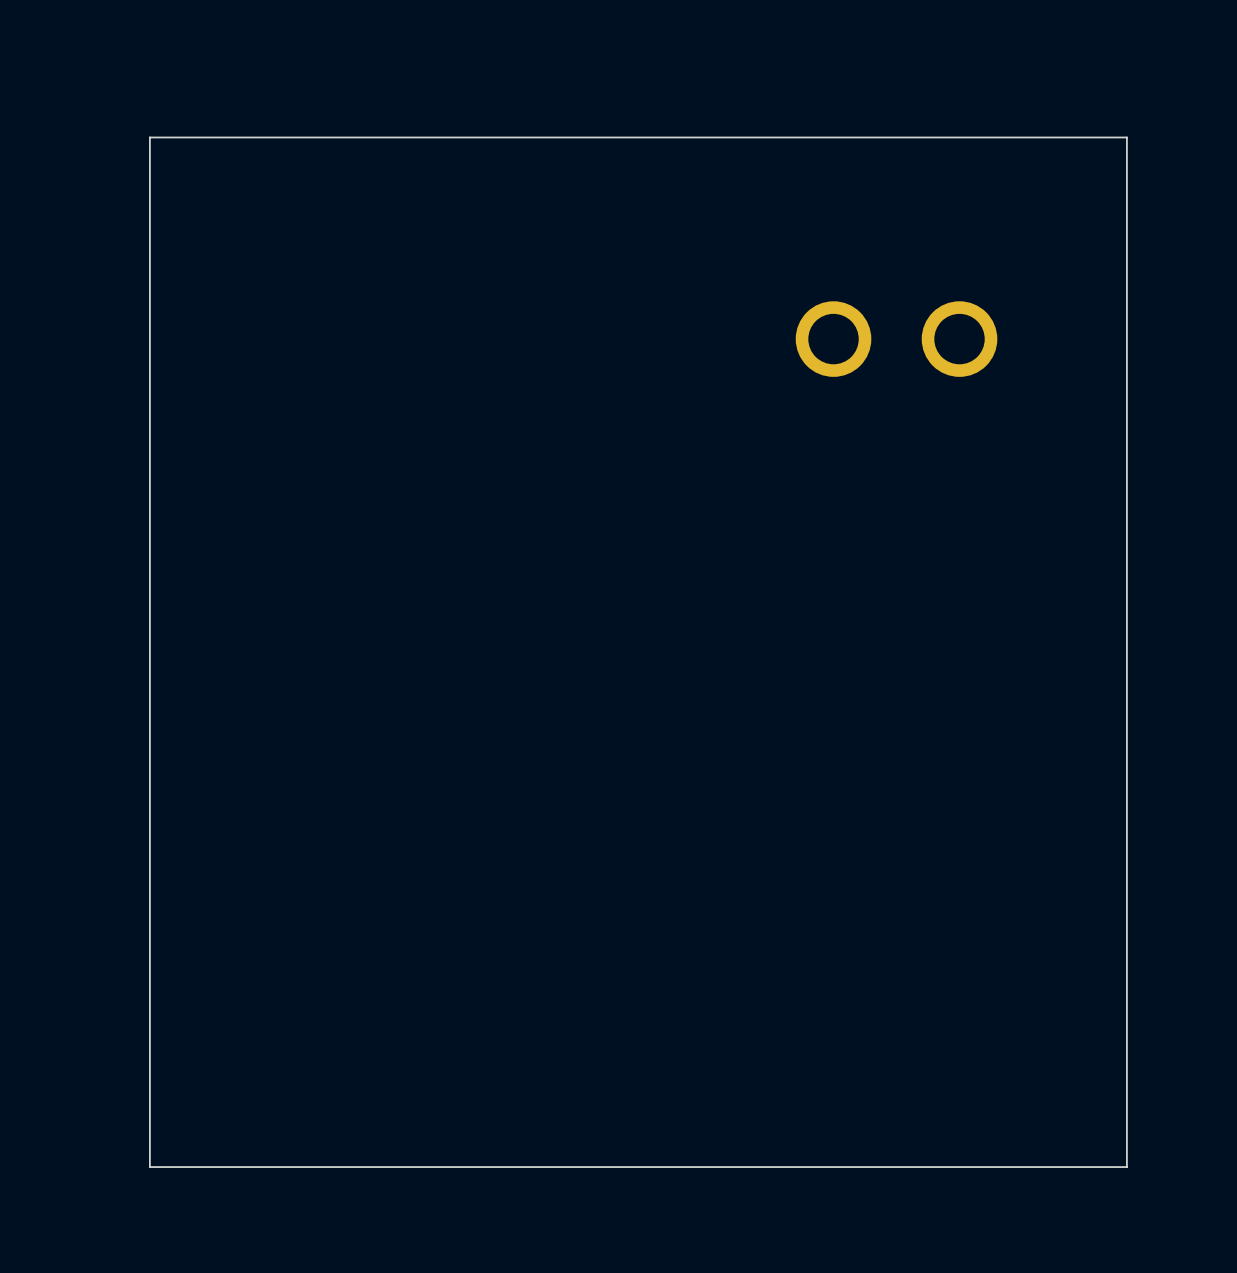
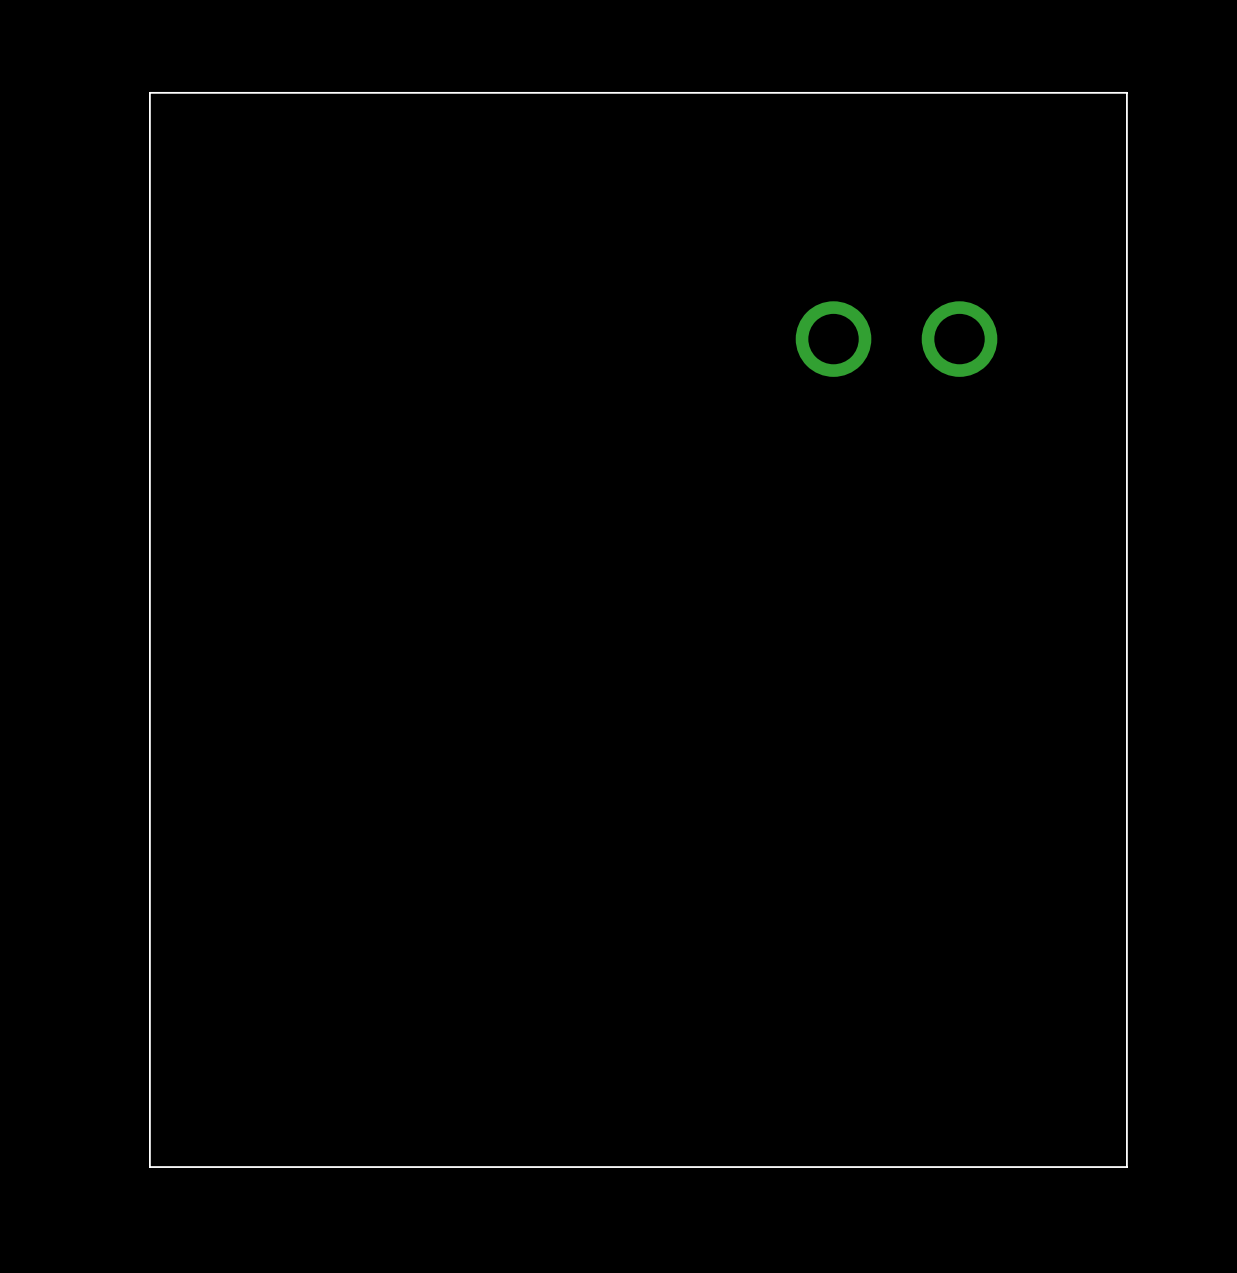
board edge: (1126, 137) (149, 137) -> (1126, 137) (1126, 92) (149, 92) (149, 137)

